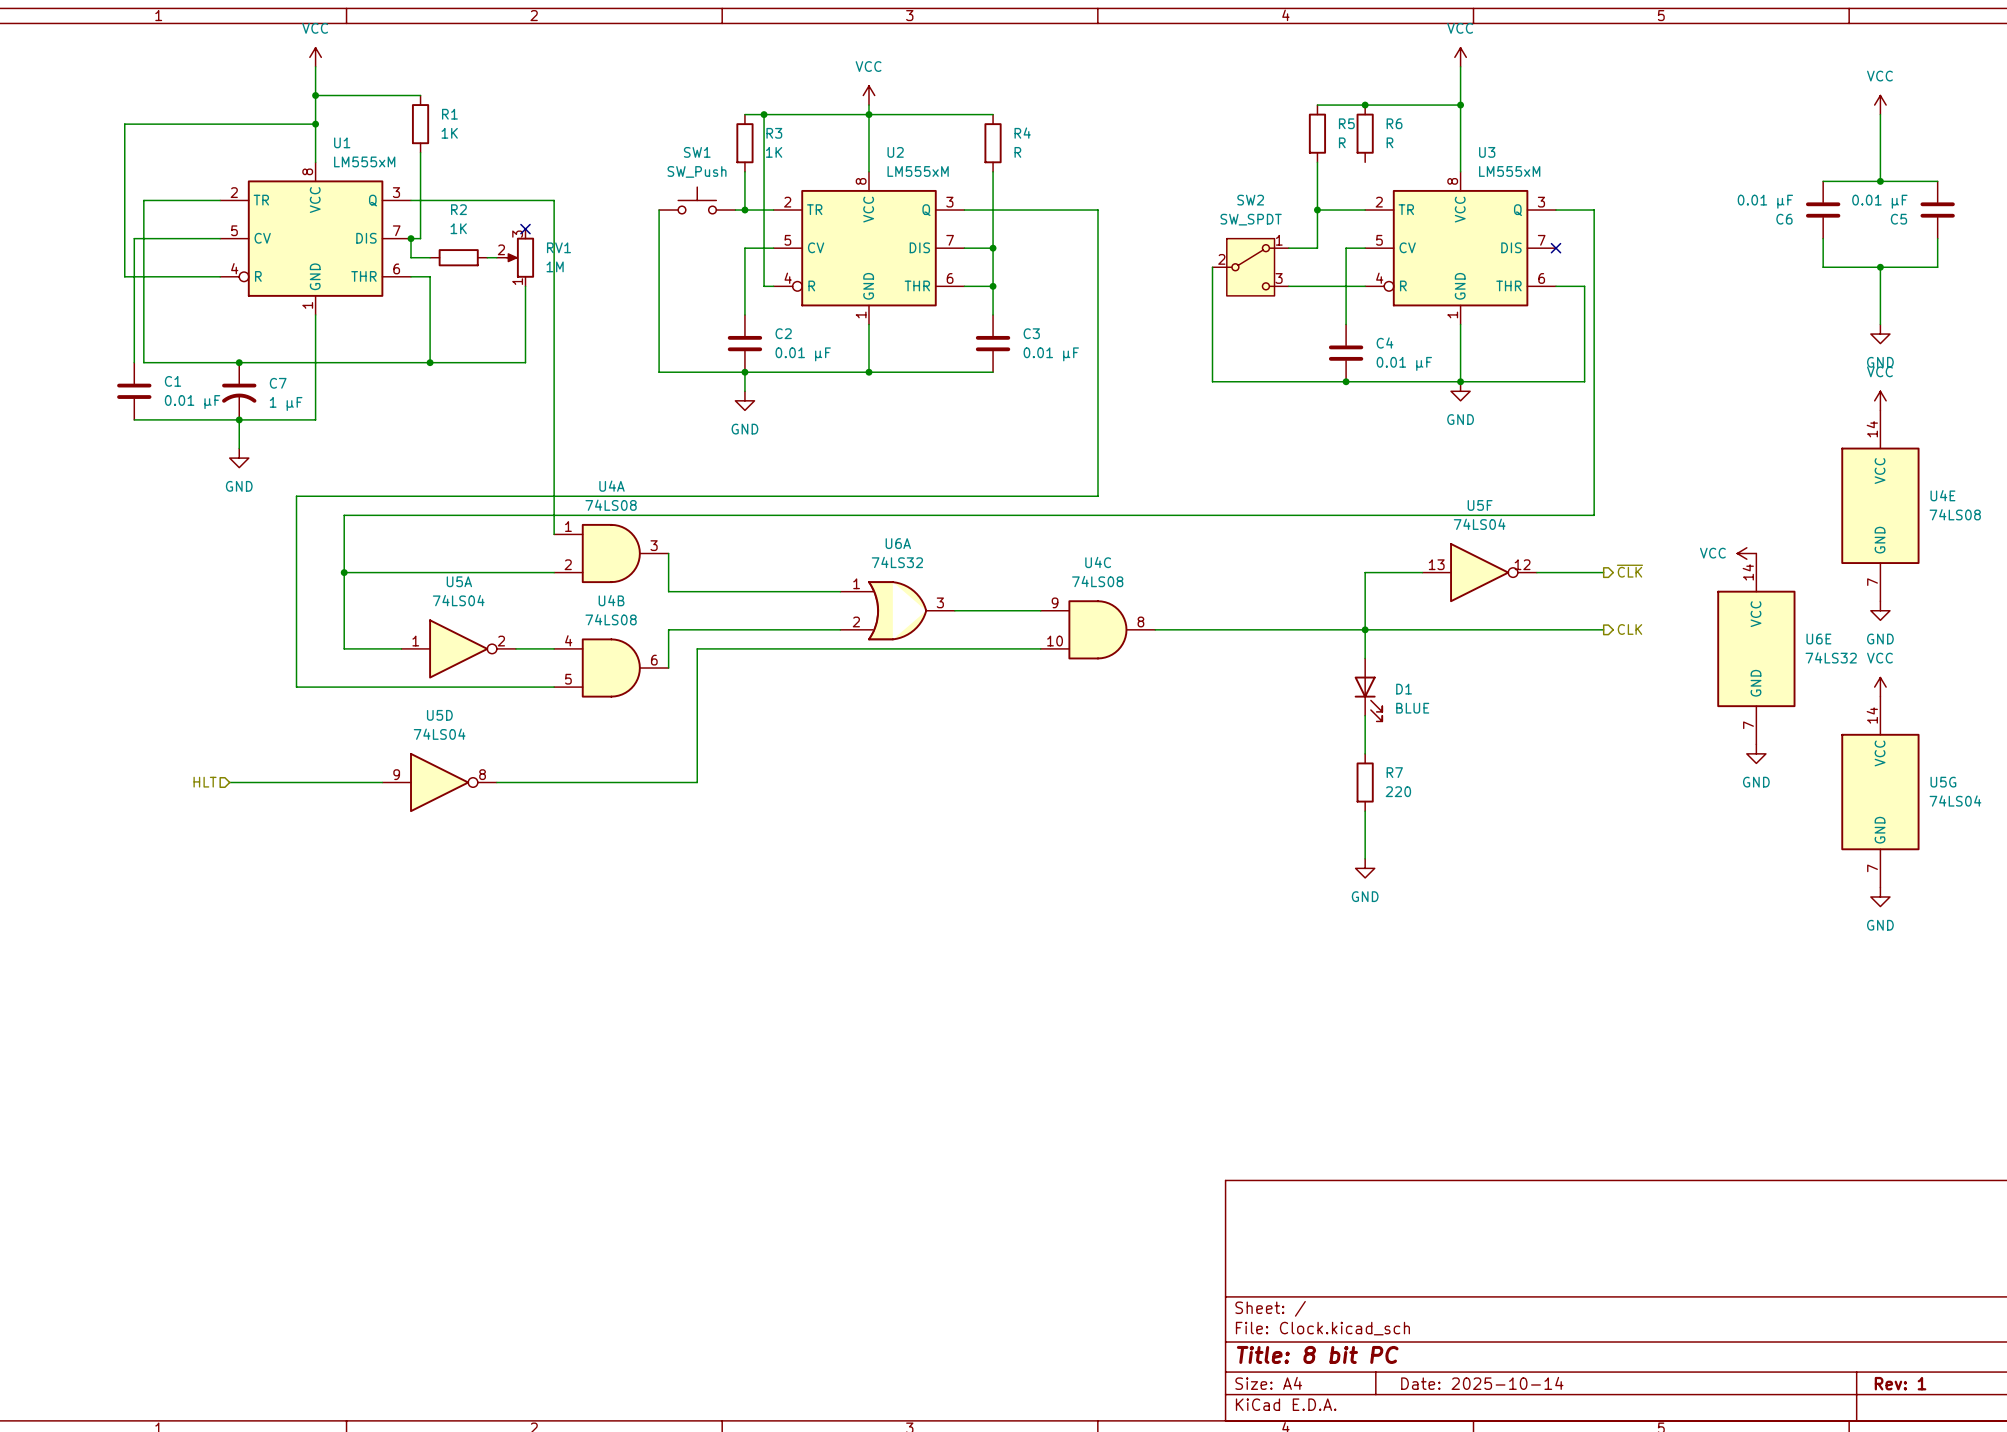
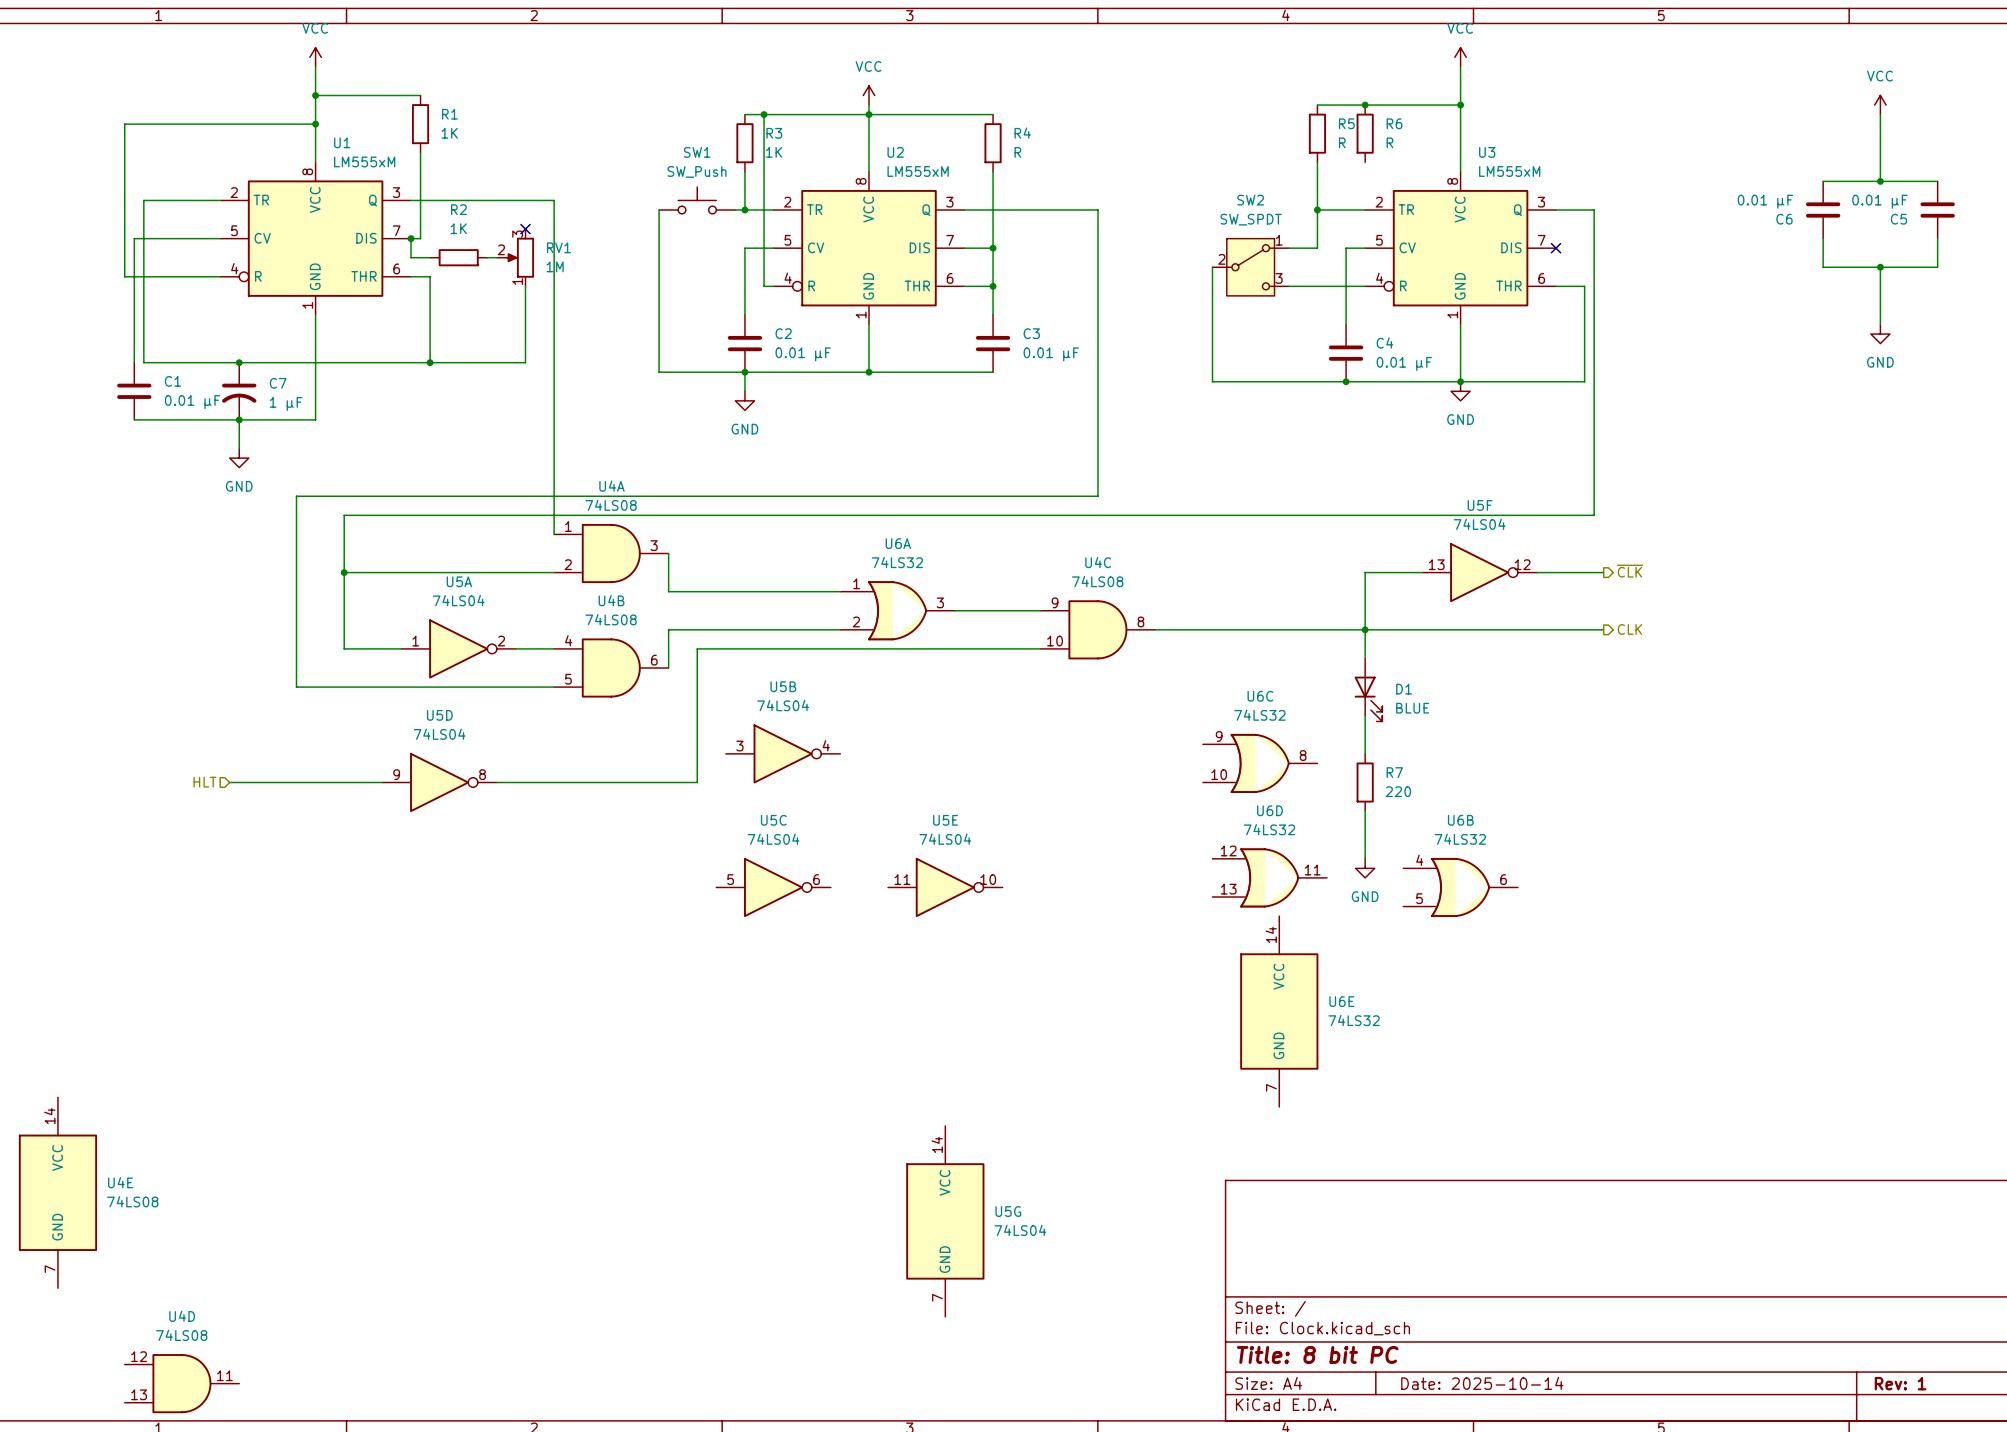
power symbol: VCC (1880, 400) -> none
U4E position: (1880, 505) -> (57, 1192)
power symbol: VCC (1746, 553) -> none
power symbol: GND (1880, 610) -> none
U6E position: (1756, 648) -> (1279, 1011)
power symbol: VCC (1880, 687) -> none
U5B: none -> 74LS04 (783, 753)
power symbol: GND (1756, 753) -> none
U6C: none -> 74LS32 (1260, 763)
U5G position: (1880, 792) -> (945, 1221)
U6D: none -> 74LS32 (1269, 877)
U5C: none -> 74LS04 (773, 887)
U5E: none -> 74LS04 (945, 887)
U6B: none -> 74LS32 (1460, 887)
power symbol: GND (1880, 897) -> none
U4D: none -> 74LS08 (182, 1383)

